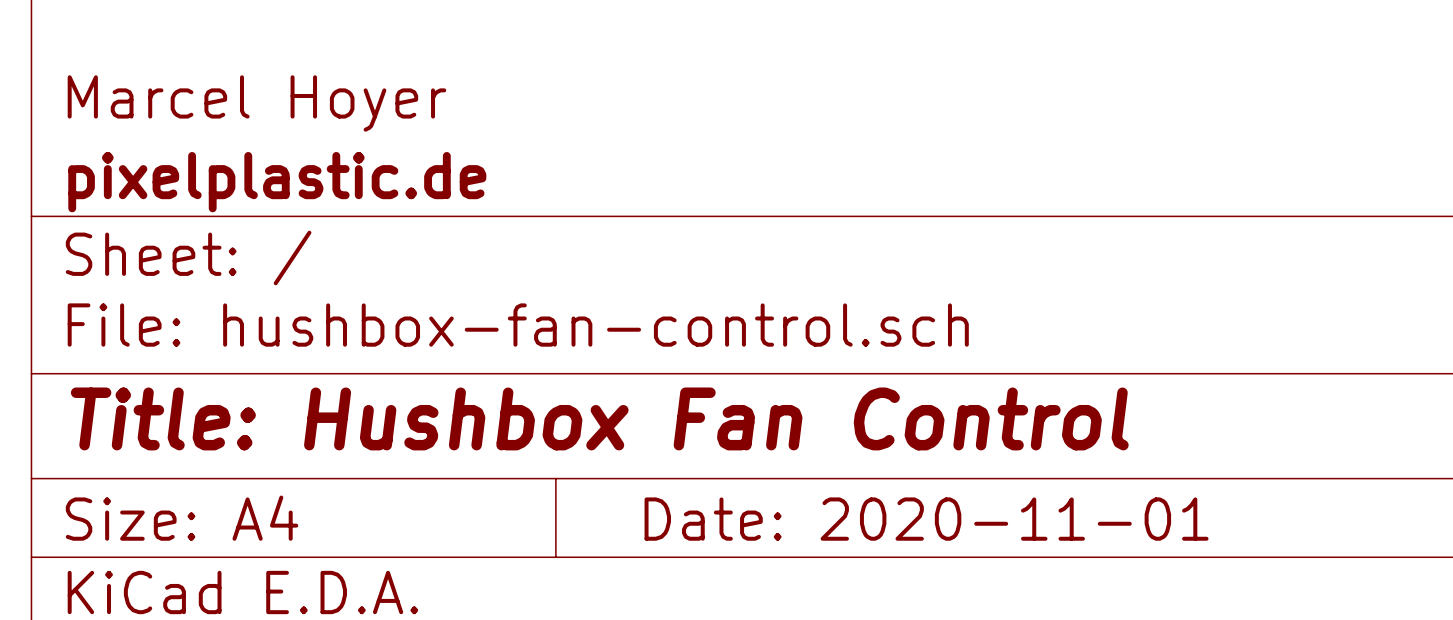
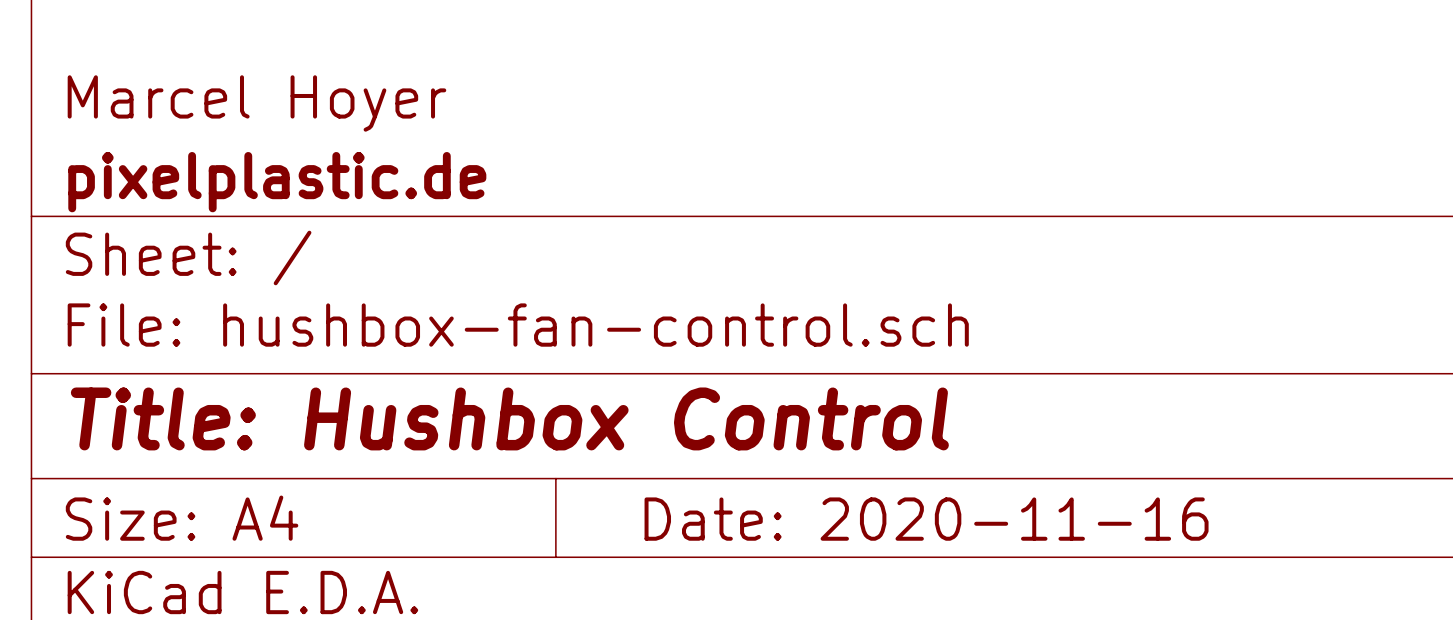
title block: Title: Hushbox Fan Control (599, 418) -> Title: Hushbox Control (509, 418)
title block: Date: 2020-11-01 (926, 519) -> Date: 2020-11-16 (926, 519)

